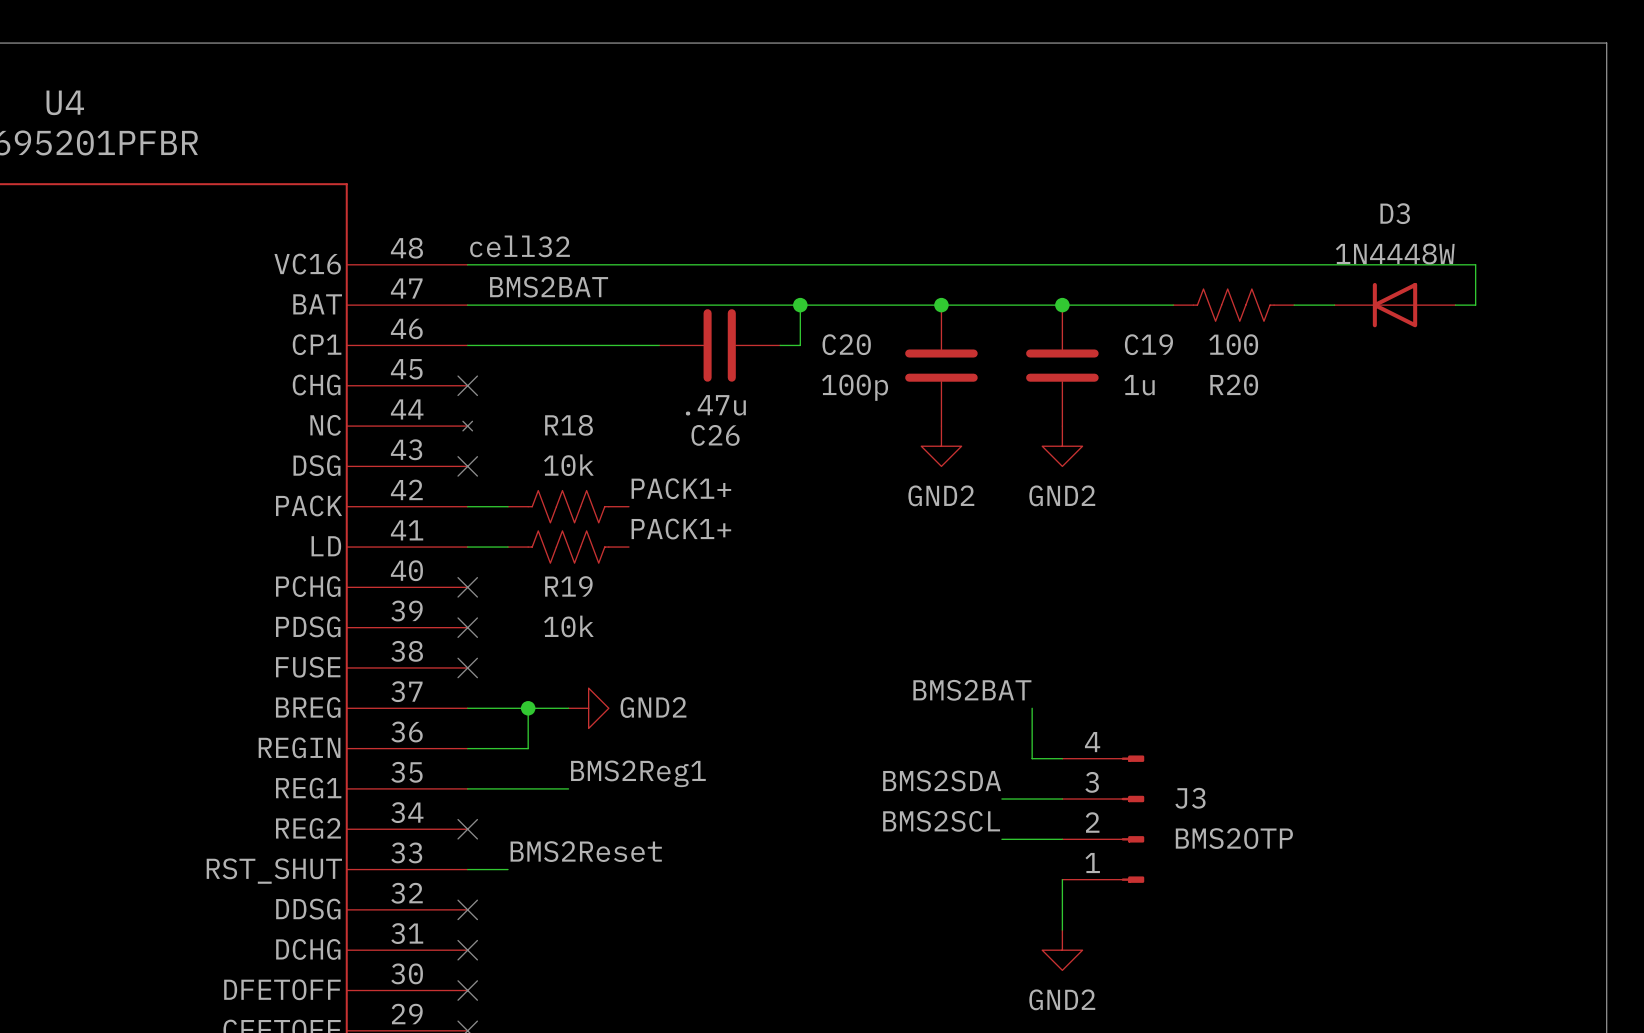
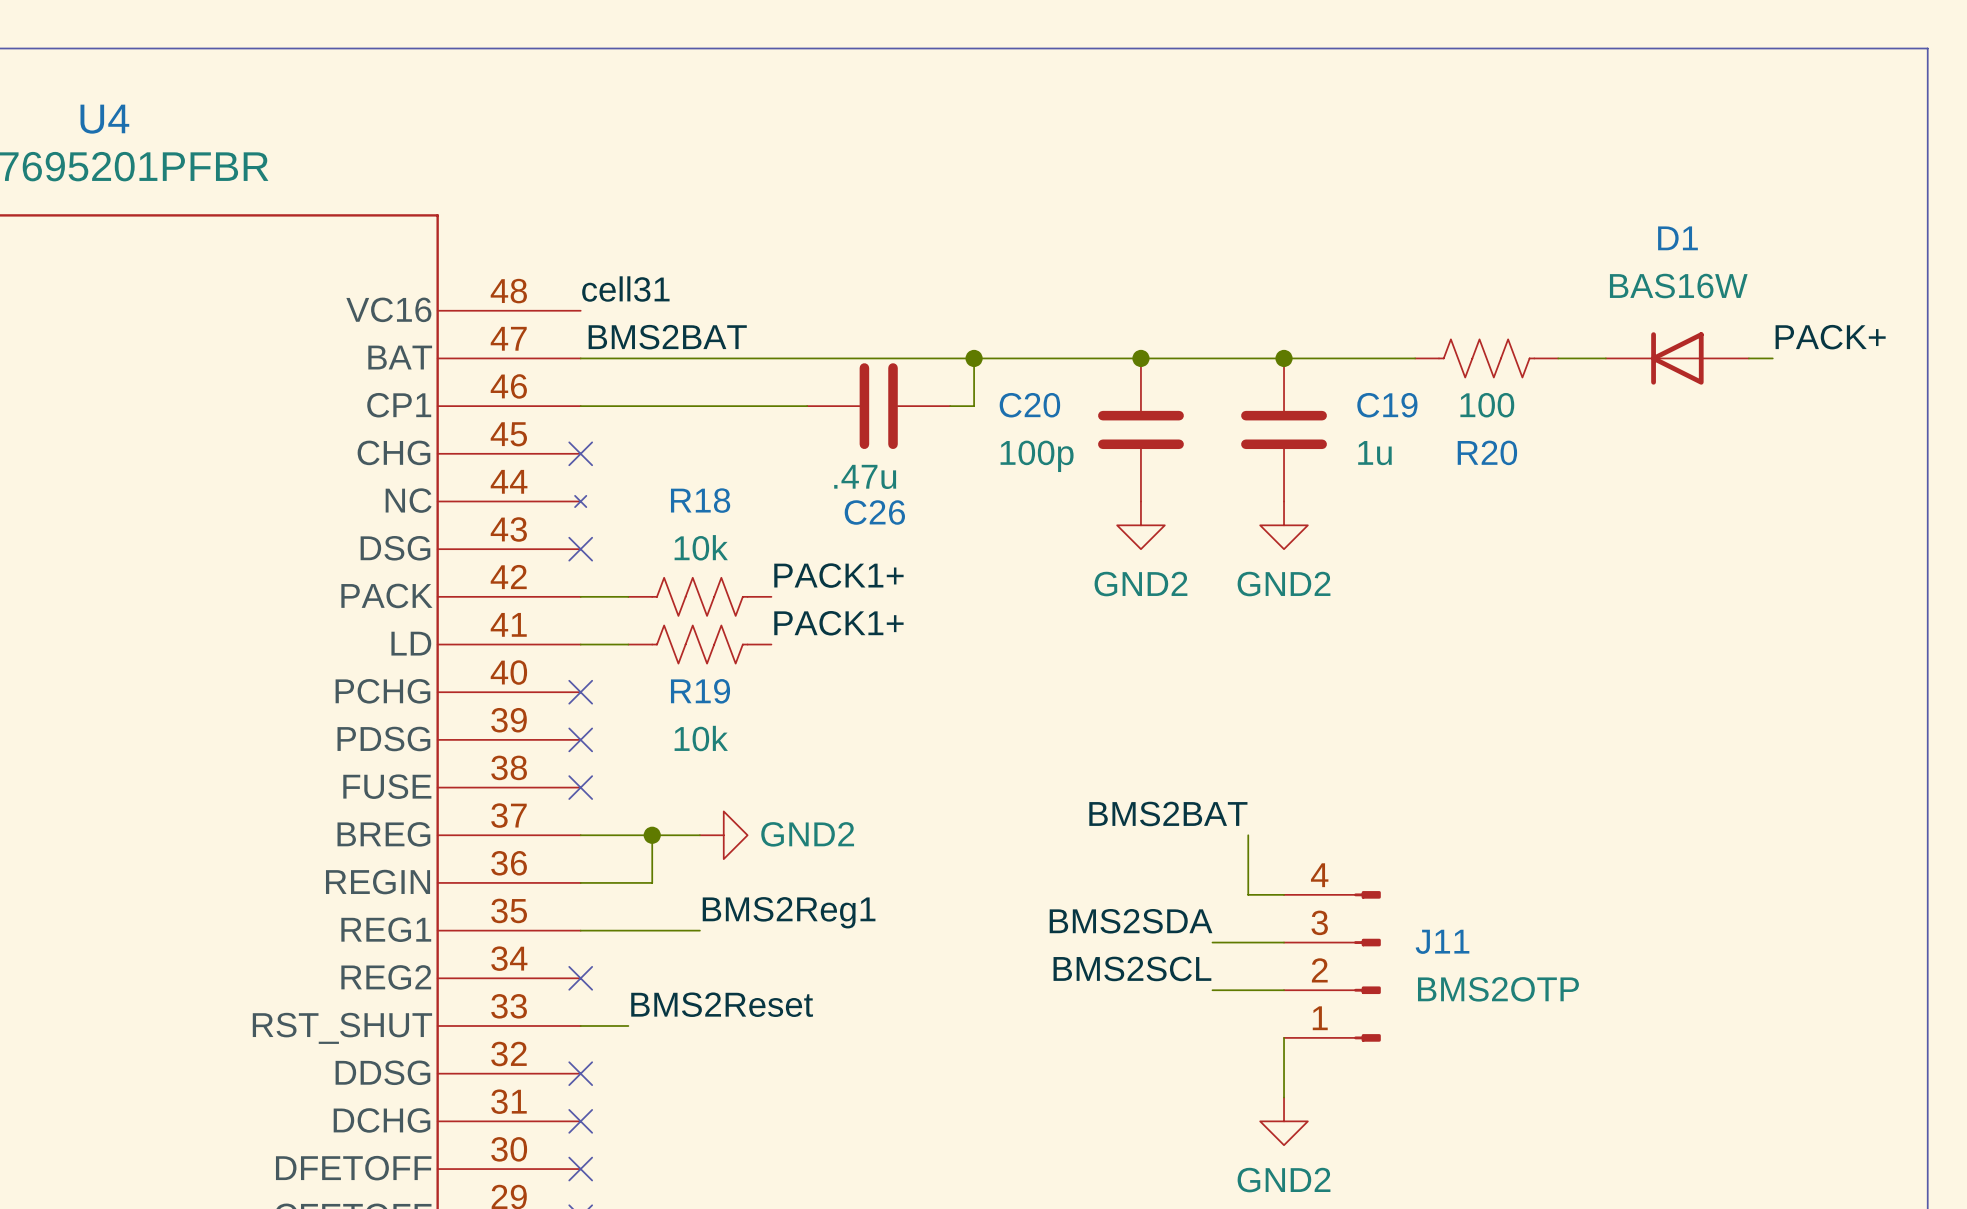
D3 name: D3 (1395, 213) -> D1 (1677, 238)
label: cell32 (520, 246) -> cell31 (625, 289)
D3 value: 1N4448W (1395, 253) -> BAS16W (1678, 286)
wire: (467, 264) (1475, 264) (1475, 305) -> none
label: none -> PACK+ (1830, 337)
J3 name: J3 (1190, 798) -> J11 (1442, 941)

